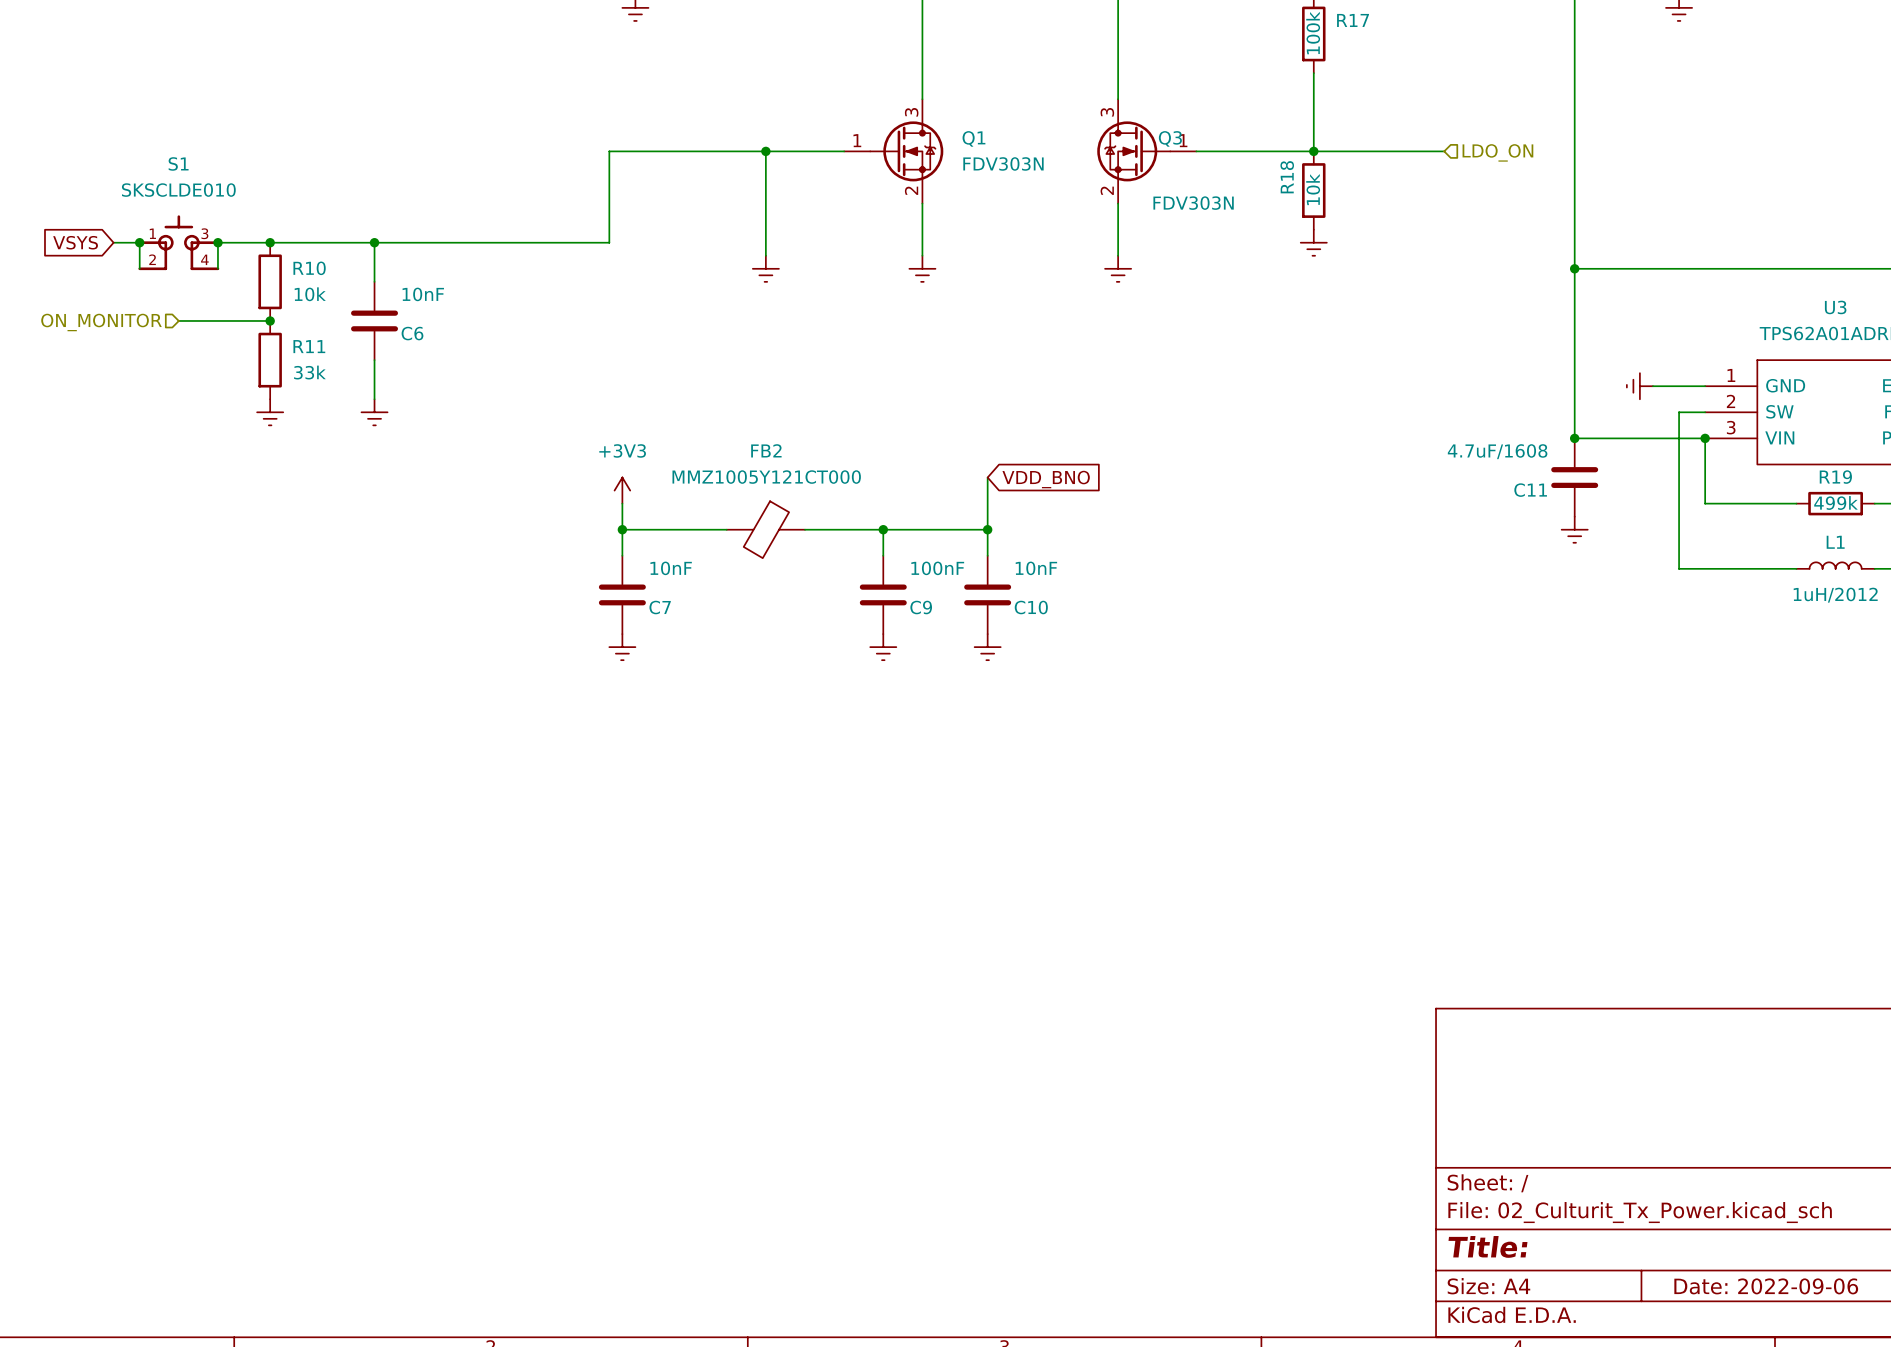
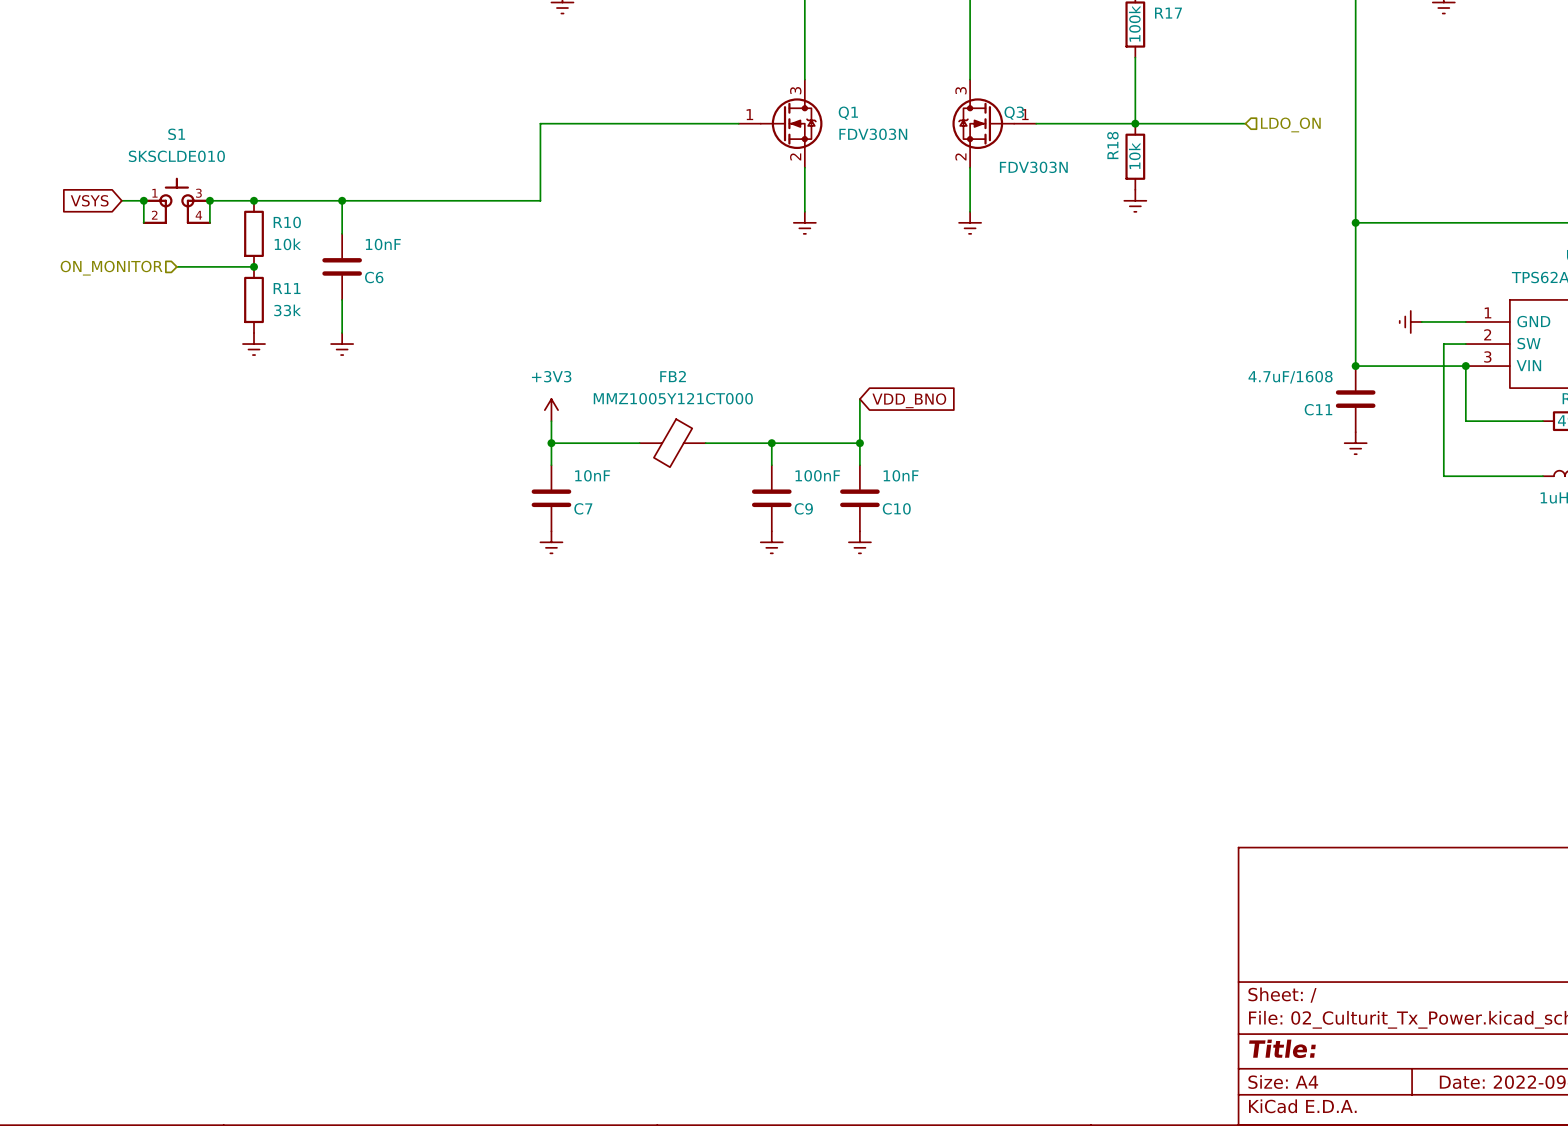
wire: (765, 151) (765, 255) -> none
junction: (765, 151) -> none
power symbol: (765, 268) -> none

